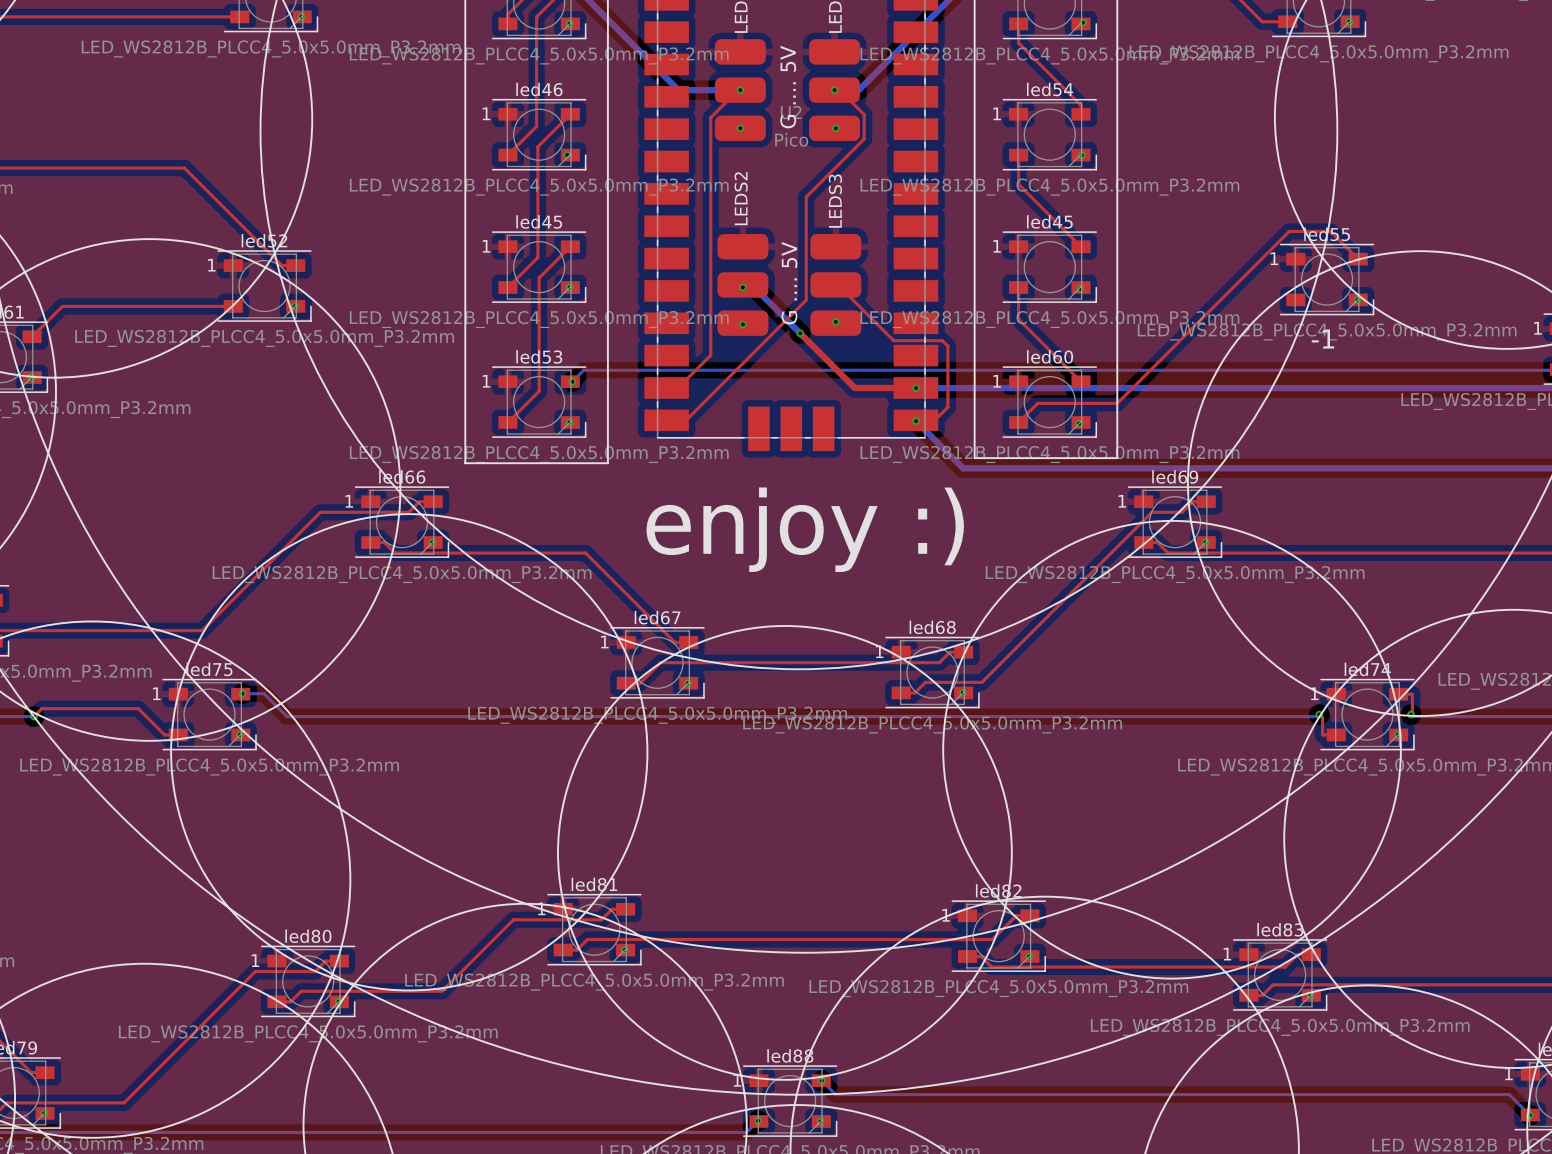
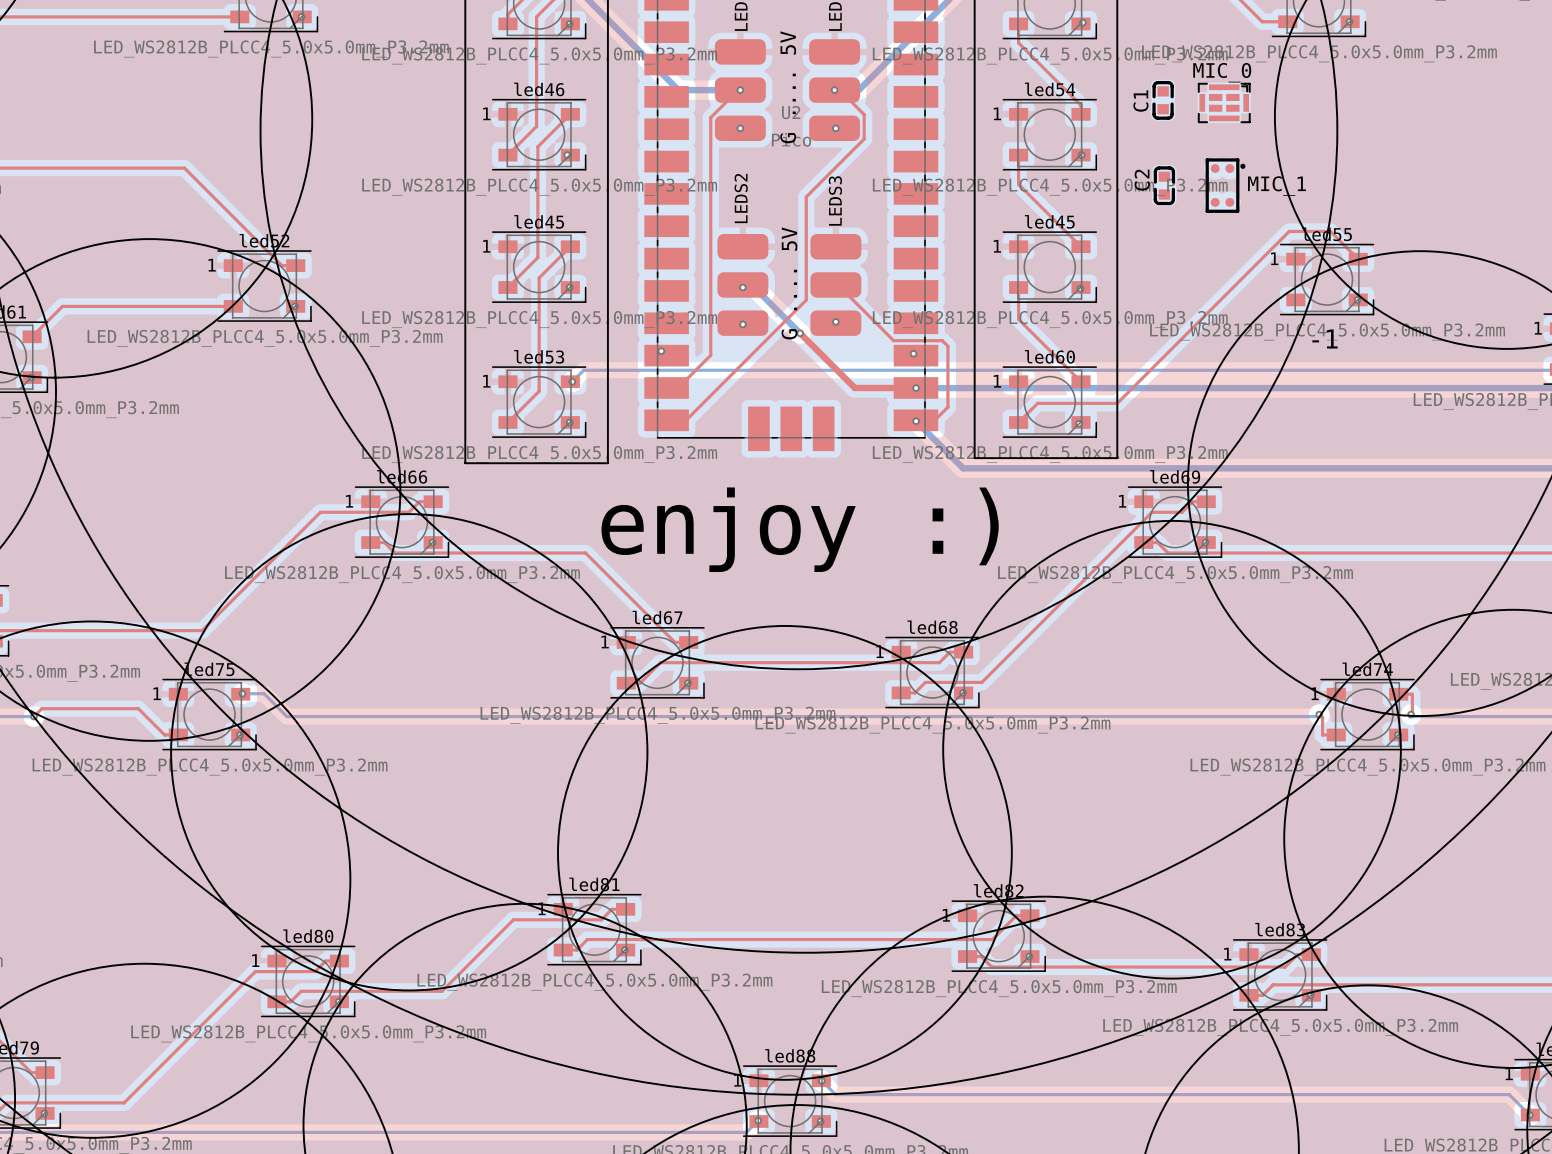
C1: none -> (1163, 100)
MIC_0: none -> (1224, 102)
C2: none -> (1164, 185)
MIC_1: none -> (1225, 185)
via: none -> (661, 351)
via: none -> (913, 353)

